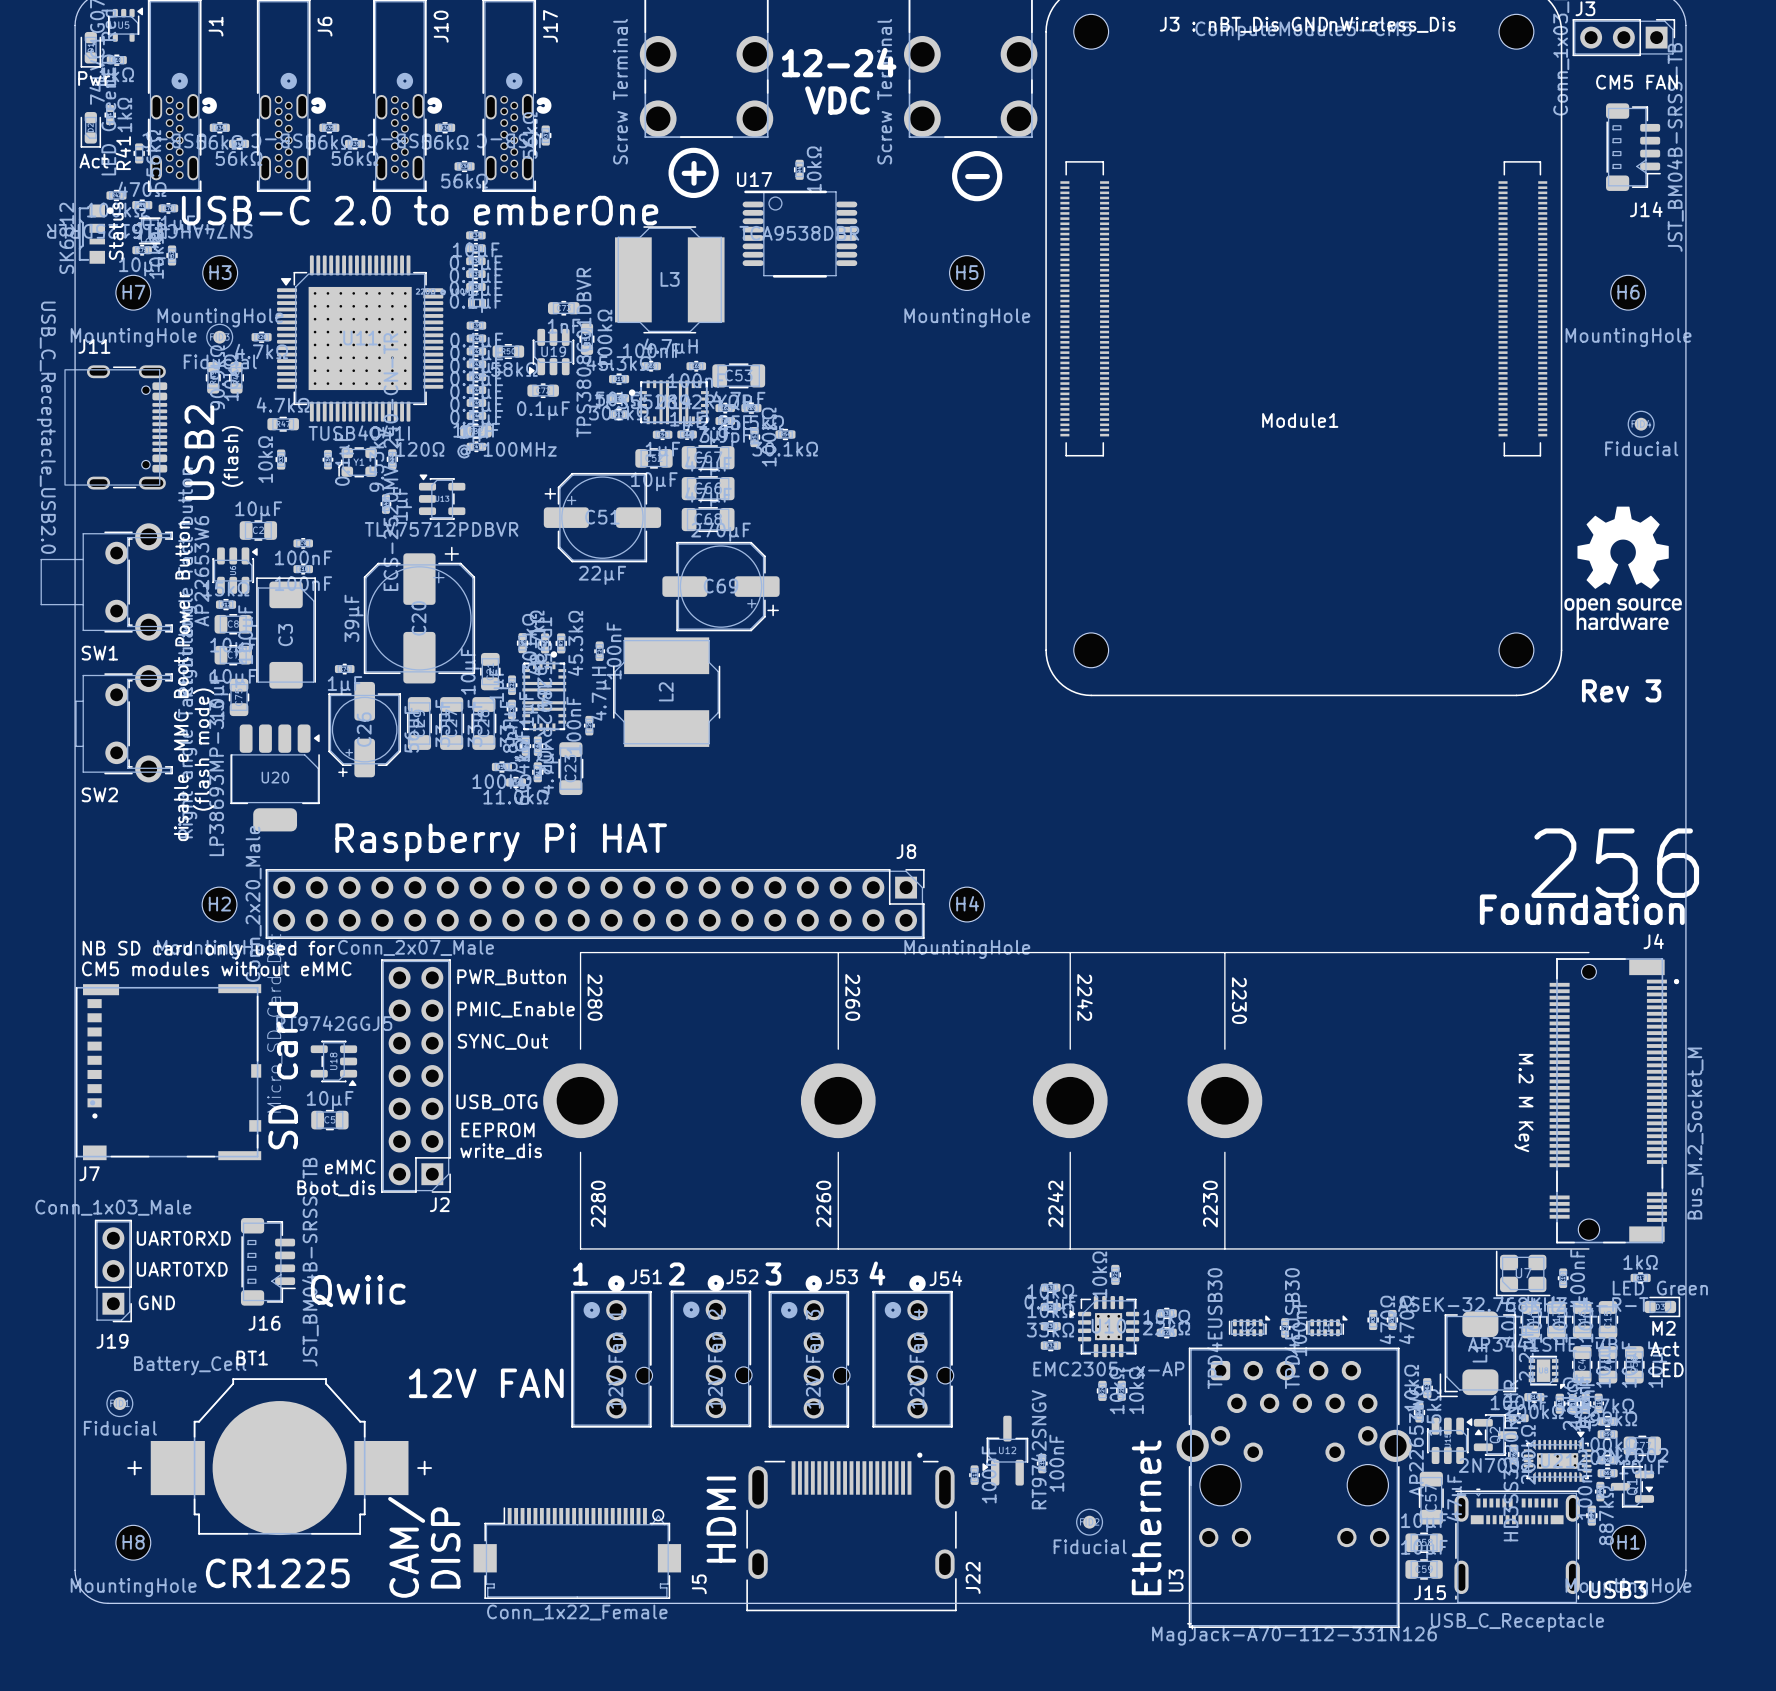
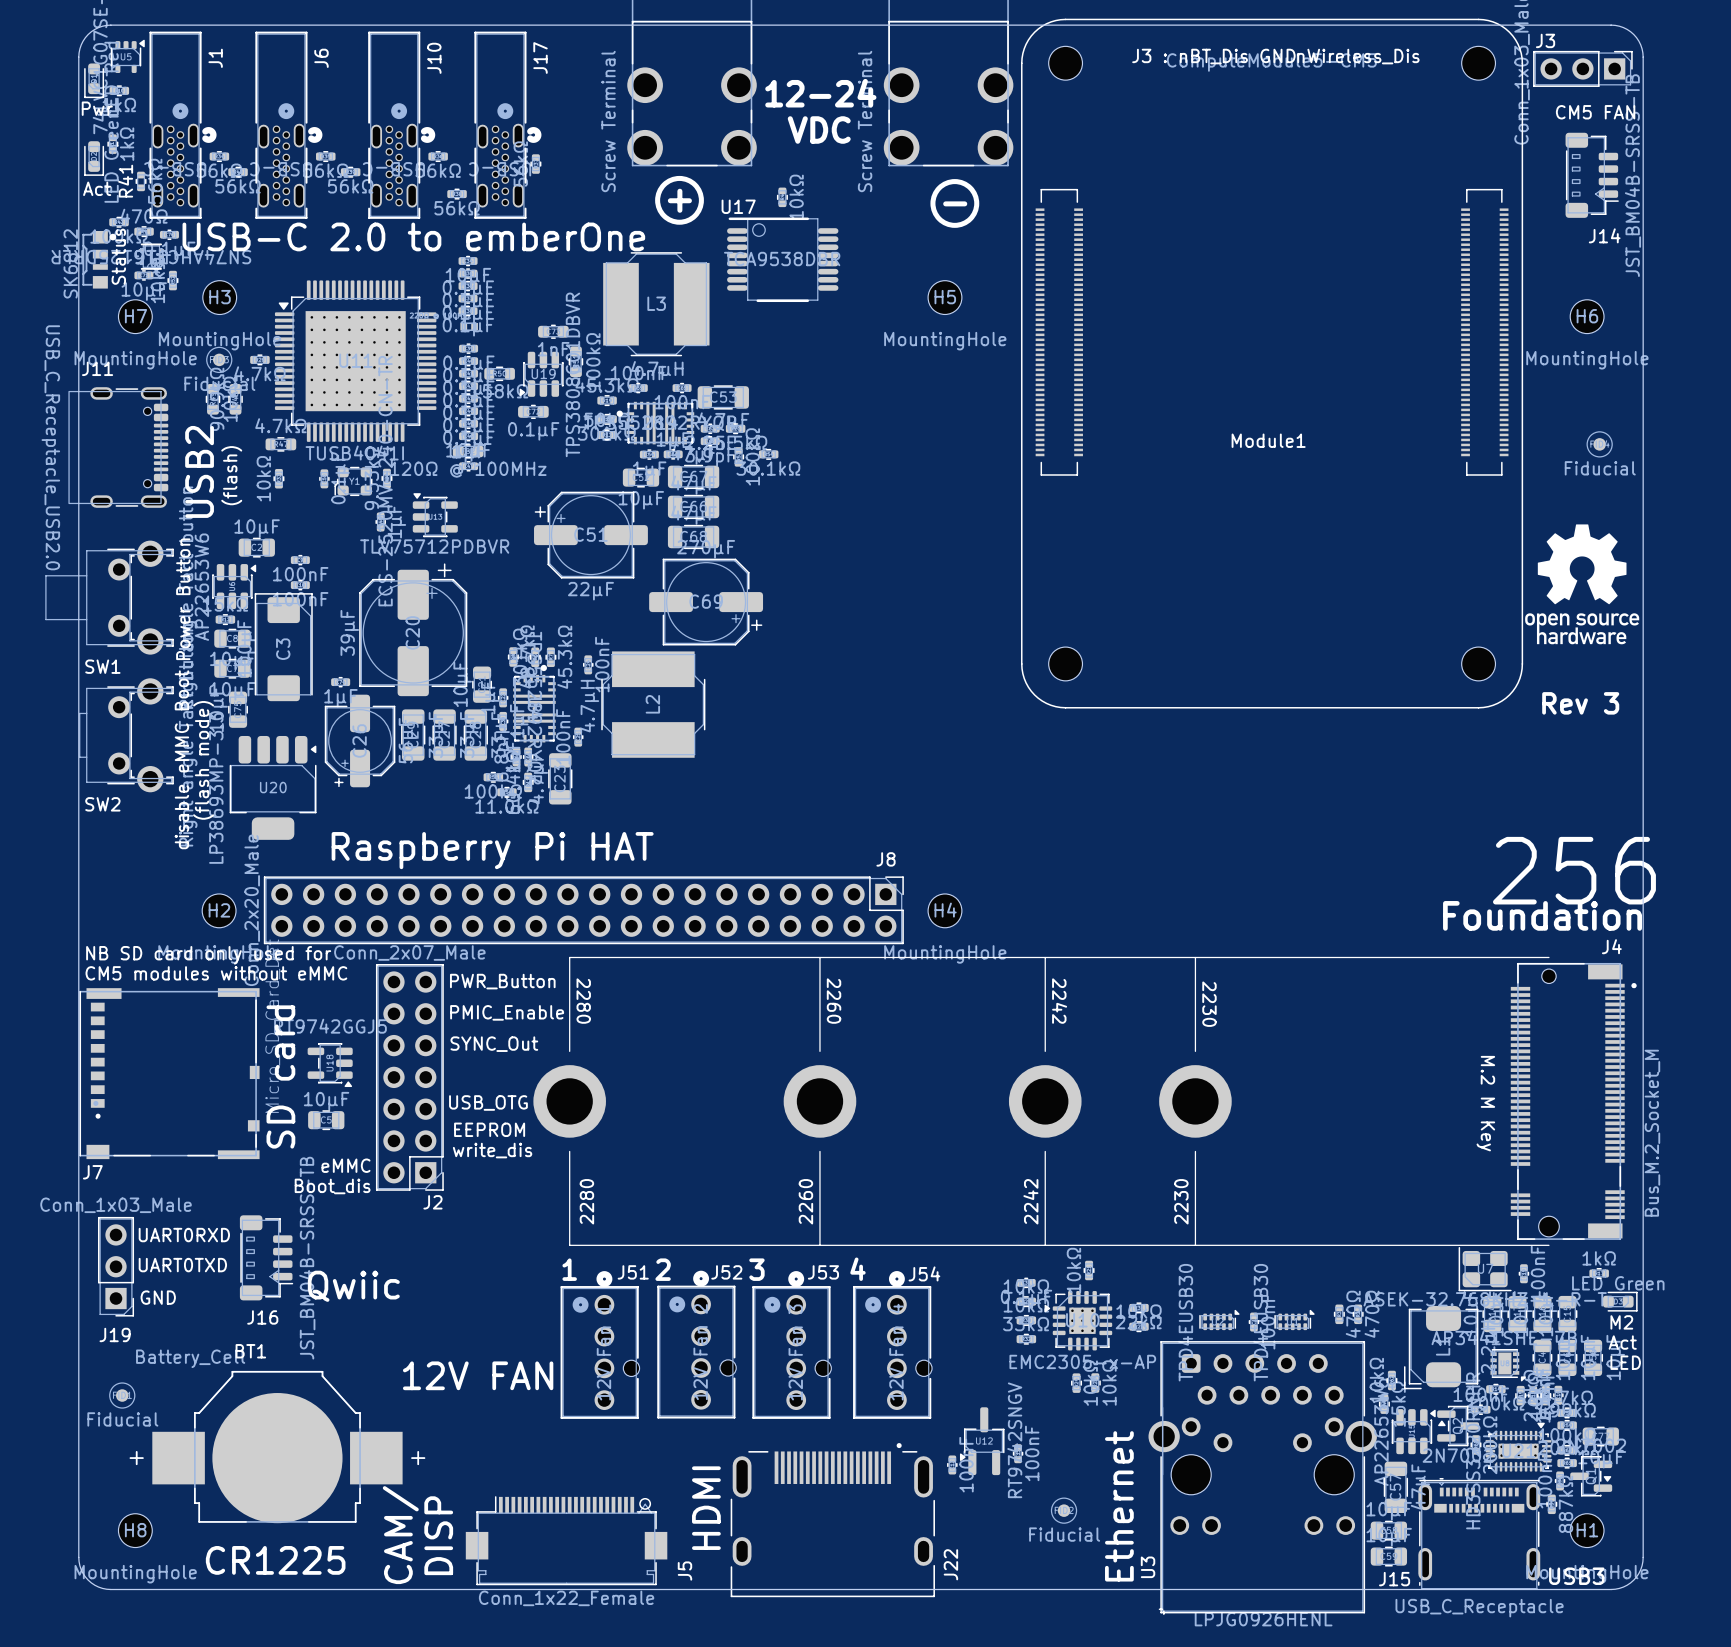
U3 value: MagJack-A70-112-331N126 (1294, 1636) -> LPJG0926HENL (1263, 1619)

